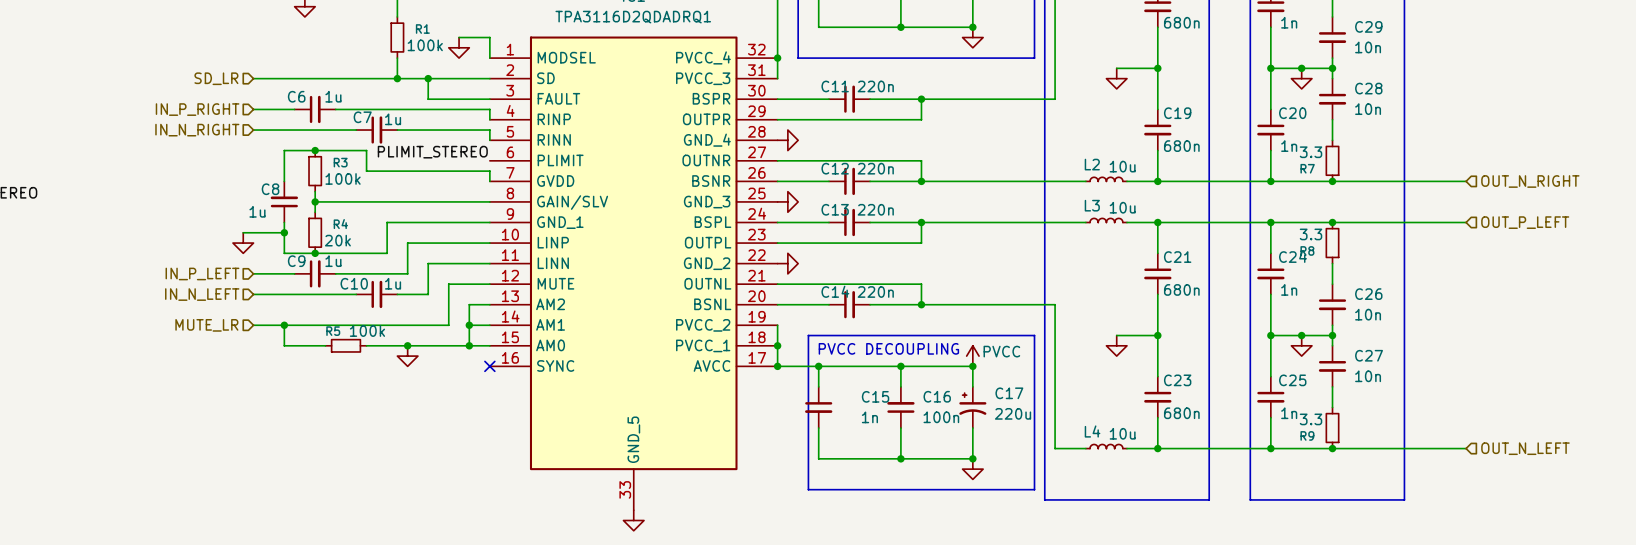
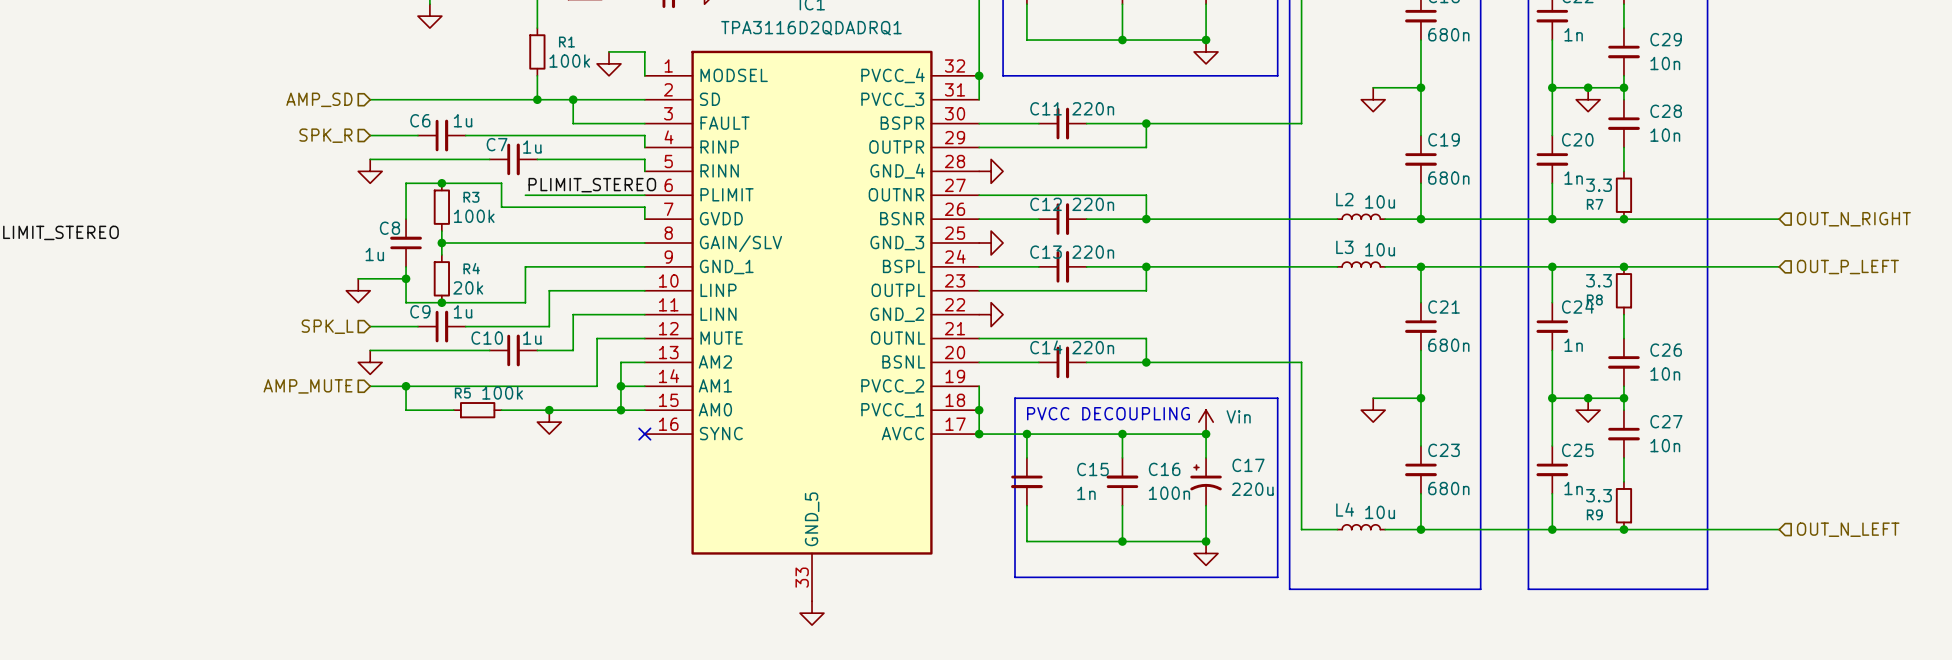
hierarchical label: SD_LR (216, 78) -> AMP_SD (319, 99)
hierarchical label: IN_P_RIGHT (197, 109) -> SPK_R (325, 135)
hierarchical label: IN_N_RIGHT (197, 130) -> none
power symbol: none -> (370, 171)
label position: PLIMIT_STEREO (432, 152) -> PLIMIT_STEREO (592, 185)
wire: none -> (525, 195) (644, 195)
hierarchical label: IN_P_LEFT (202, 273) -> SPK_L (327, 326)
hierarchical label: IN_N_LEFT (202, 294) -> none
power symbol: none -> (370, 362)
hierarchical label: MUTE_LR (206, 325) -> AMP_MUTE (308, 386)
power symbol: PVCC (972, 356) -> Vin (1206, 422)

